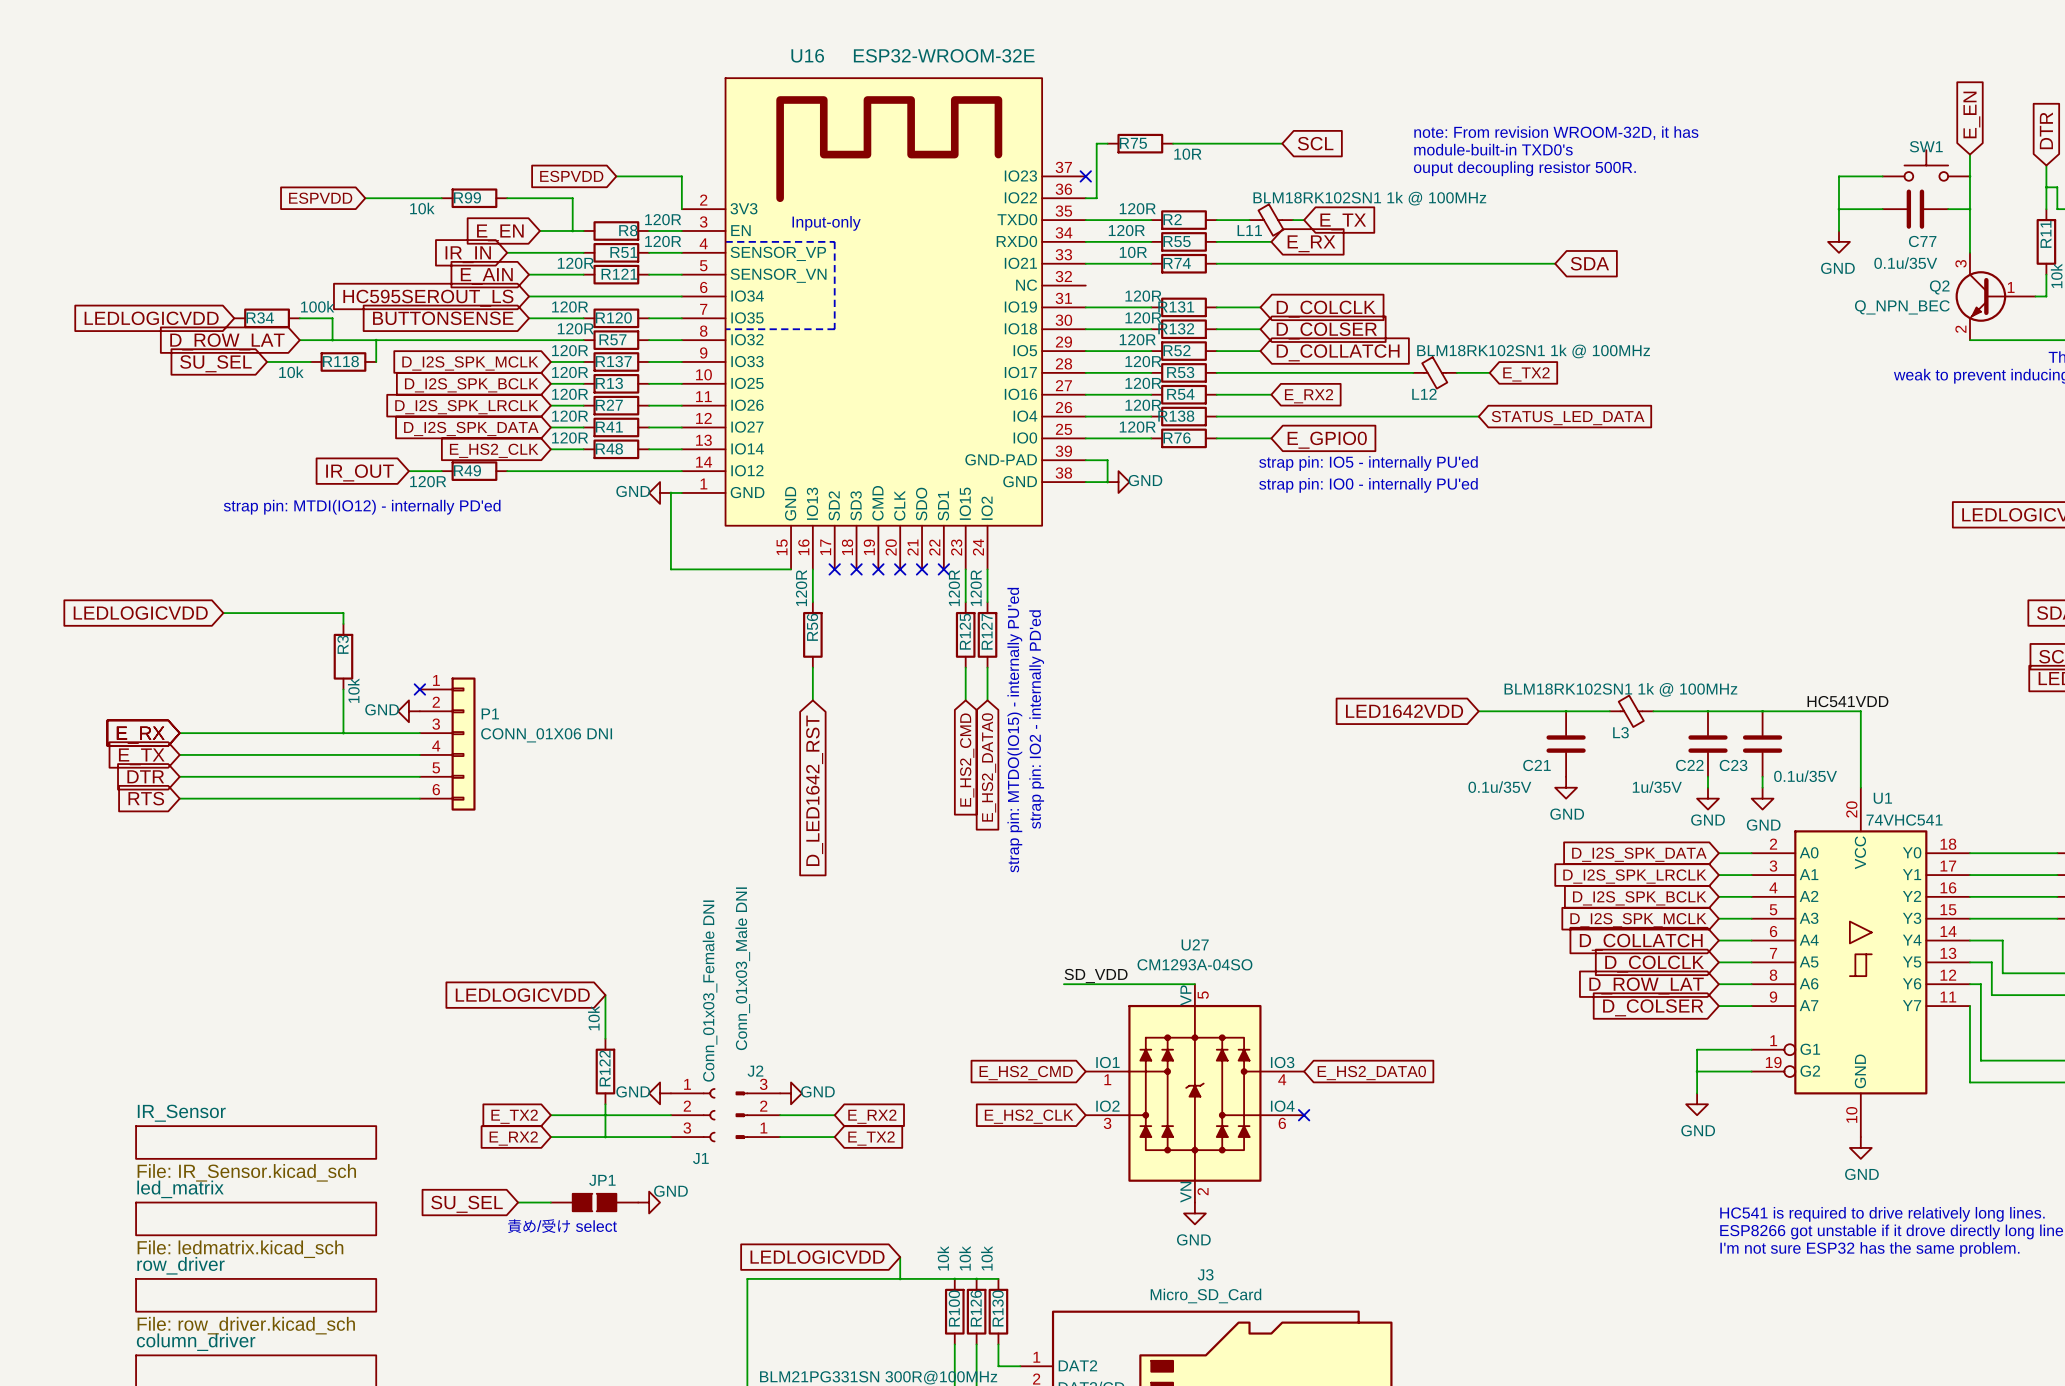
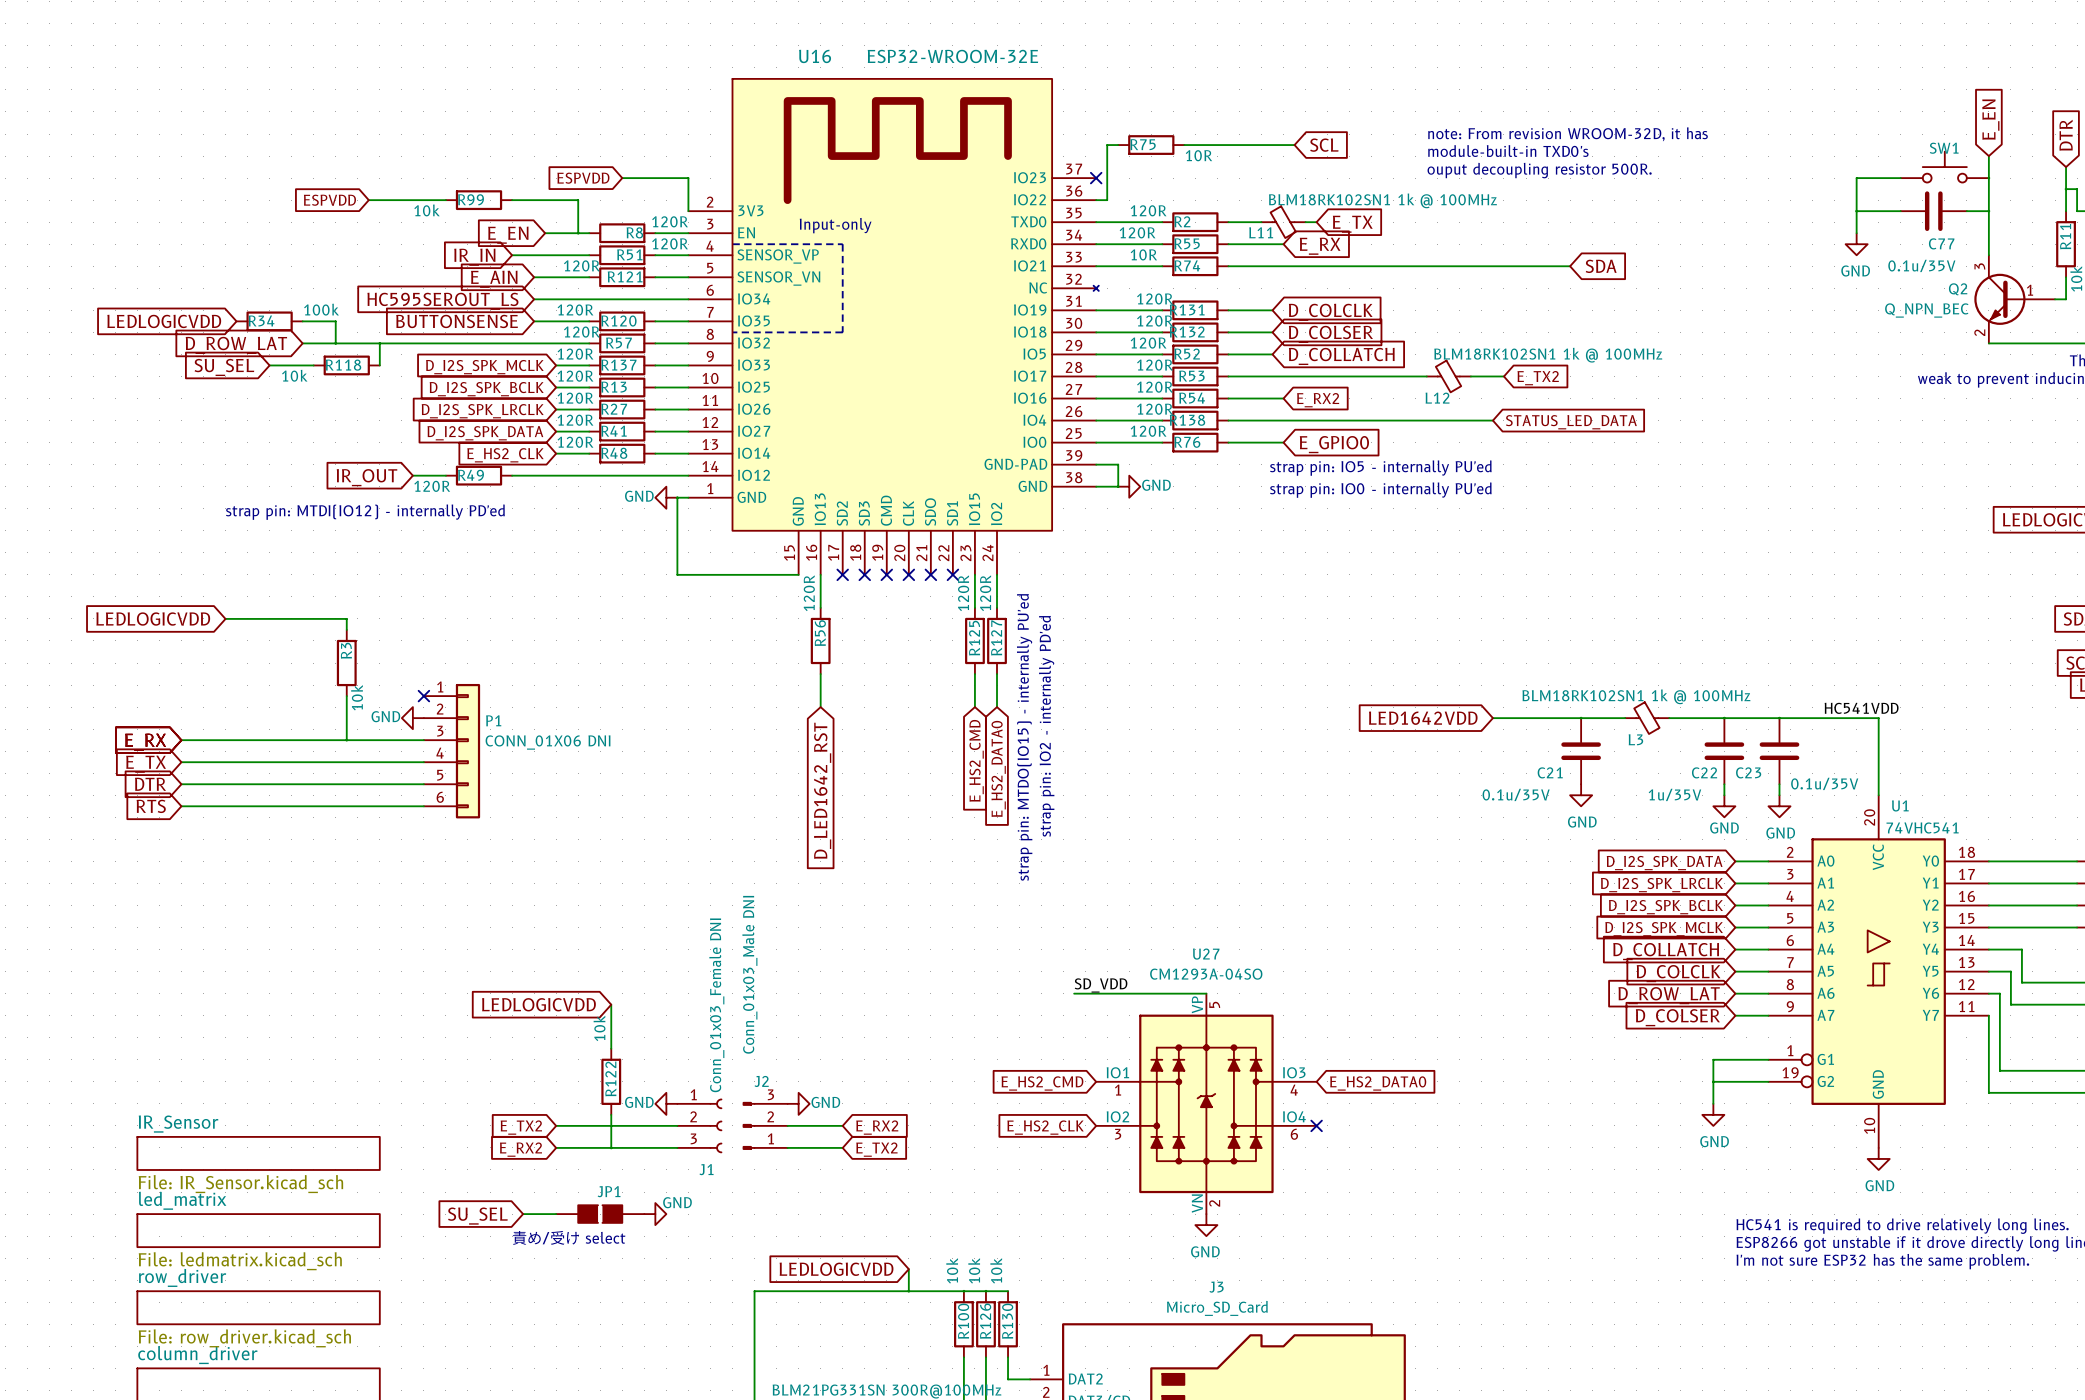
U16 symbol: [681, 78, 1086, 570] -> [688, 78, 1099, 575]

